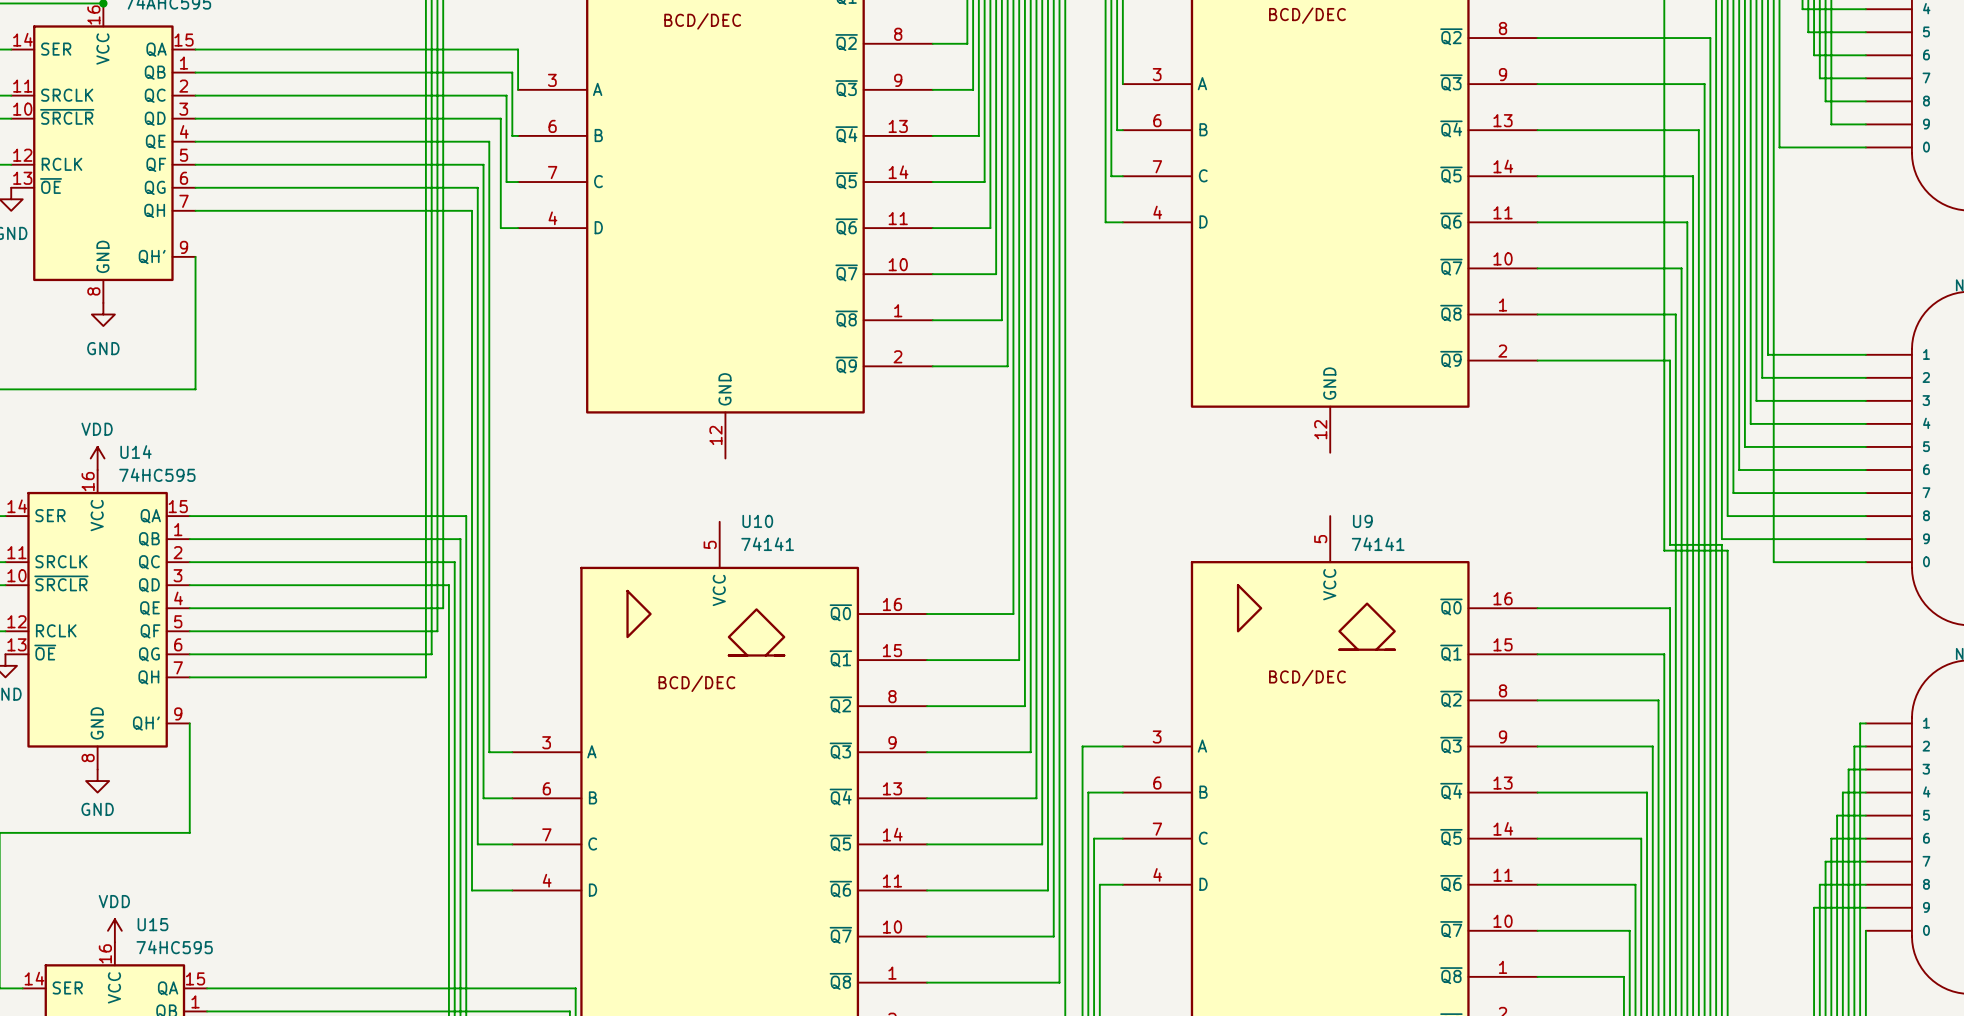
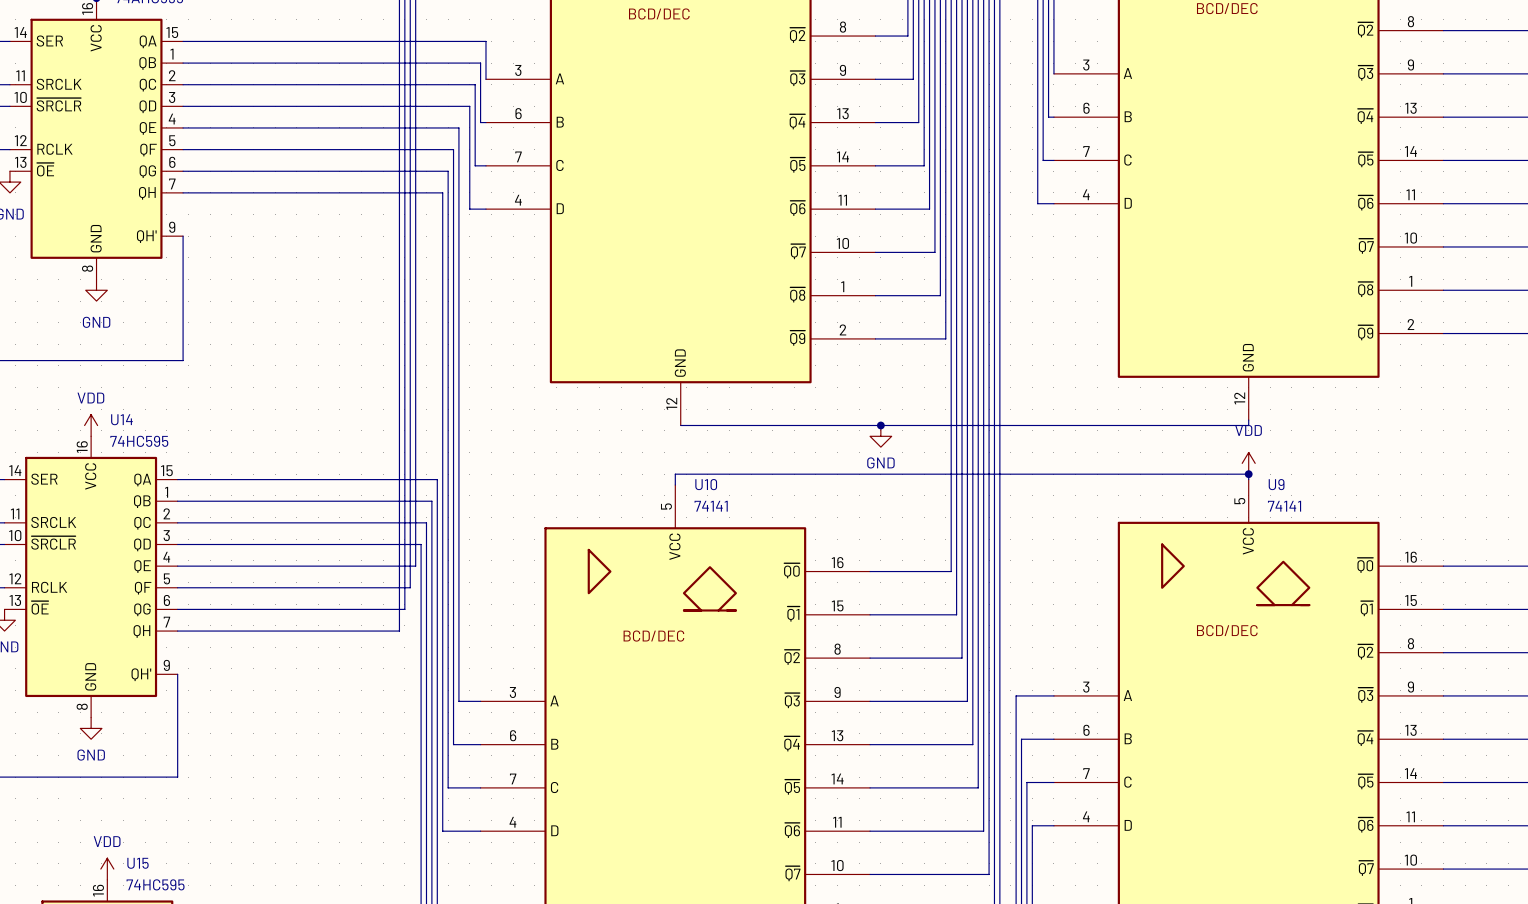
wire: none -> (1248, 420) (1248, 425) (680, 425)
junction: none -> (880, 425)
power symbol: none -> GND (880, 436)
power symbol: none -> VDD (1248, 463)
junction: none -> (1248, 474)
wire: none -> (1248, 479) (1248, 474) (675, 474) (675, 484)

